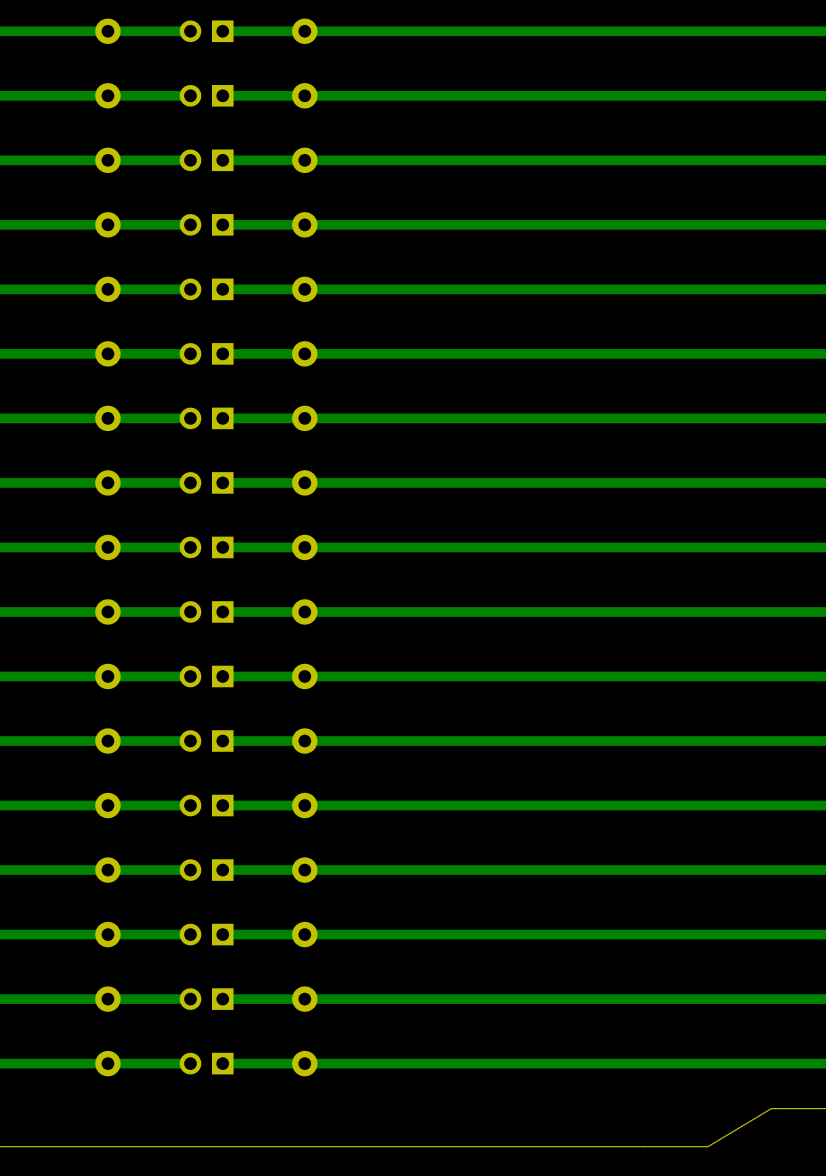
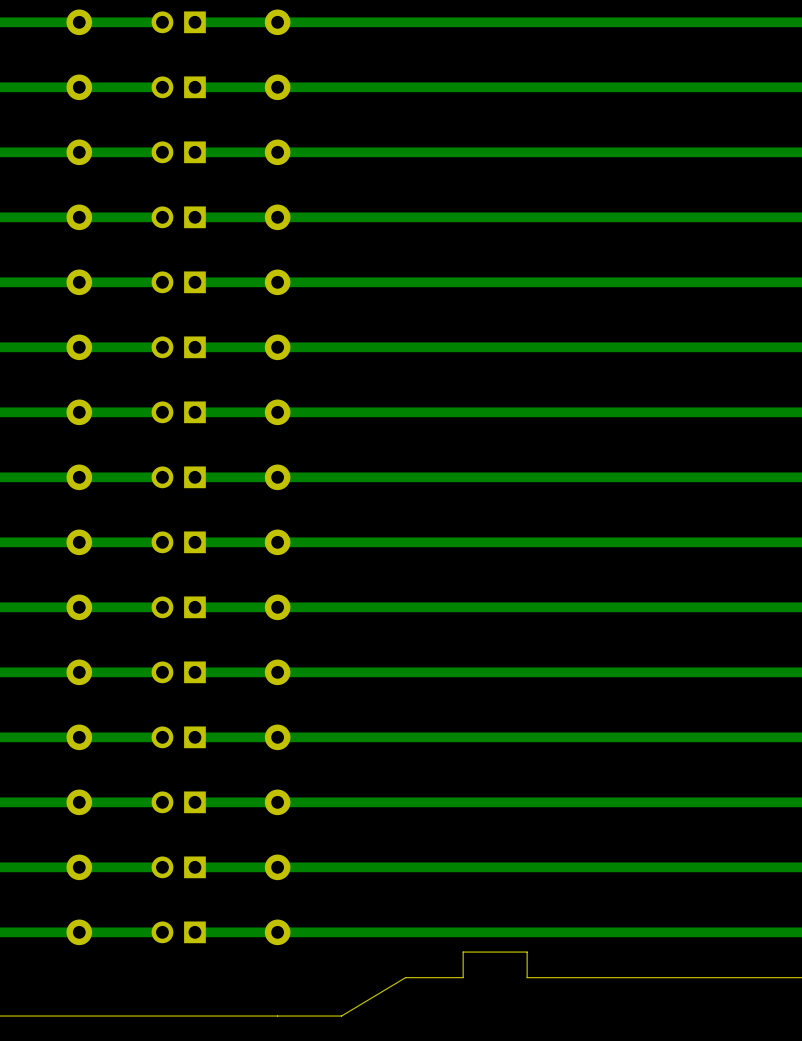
board edge: (771, 1108) (707, 1146) (368, 1146) -> (747, 977) (527, 977) (527, 952) (463, 952) (463, 977) (405, 977) (341, 1016)

